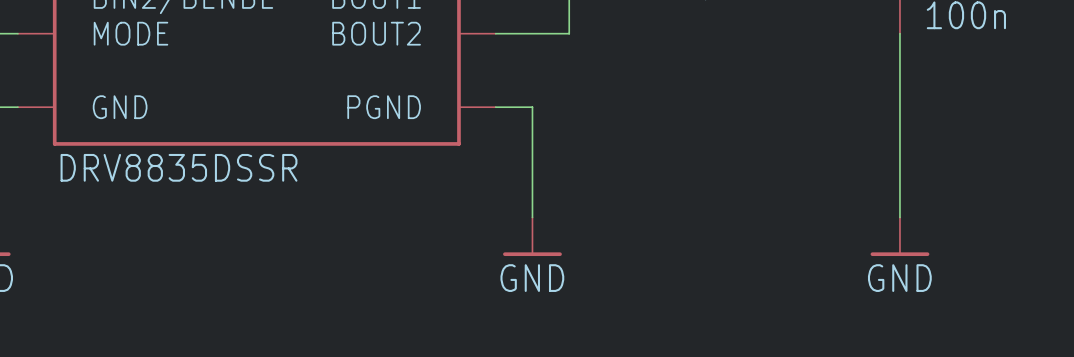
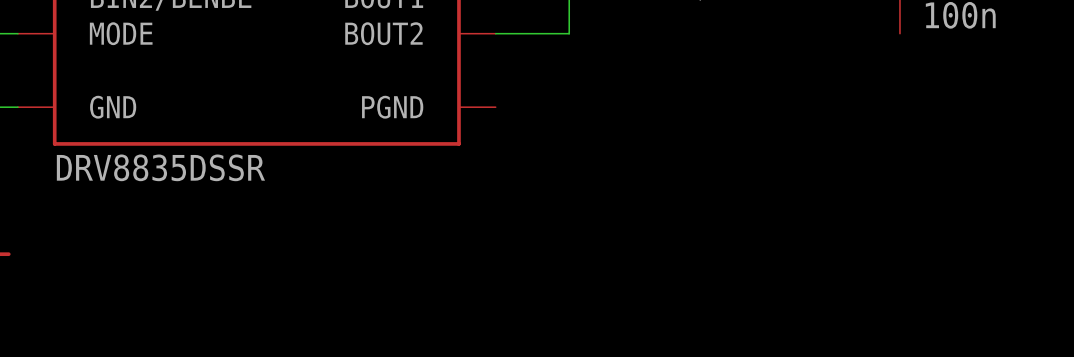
wire: (899, 33) (899, 217) -> none
wire: (495, 107) (532, 107) (532, 217) -> none
power symbol: GND (532, 236) -> none
power symbol: GND (899, 236) -> none

